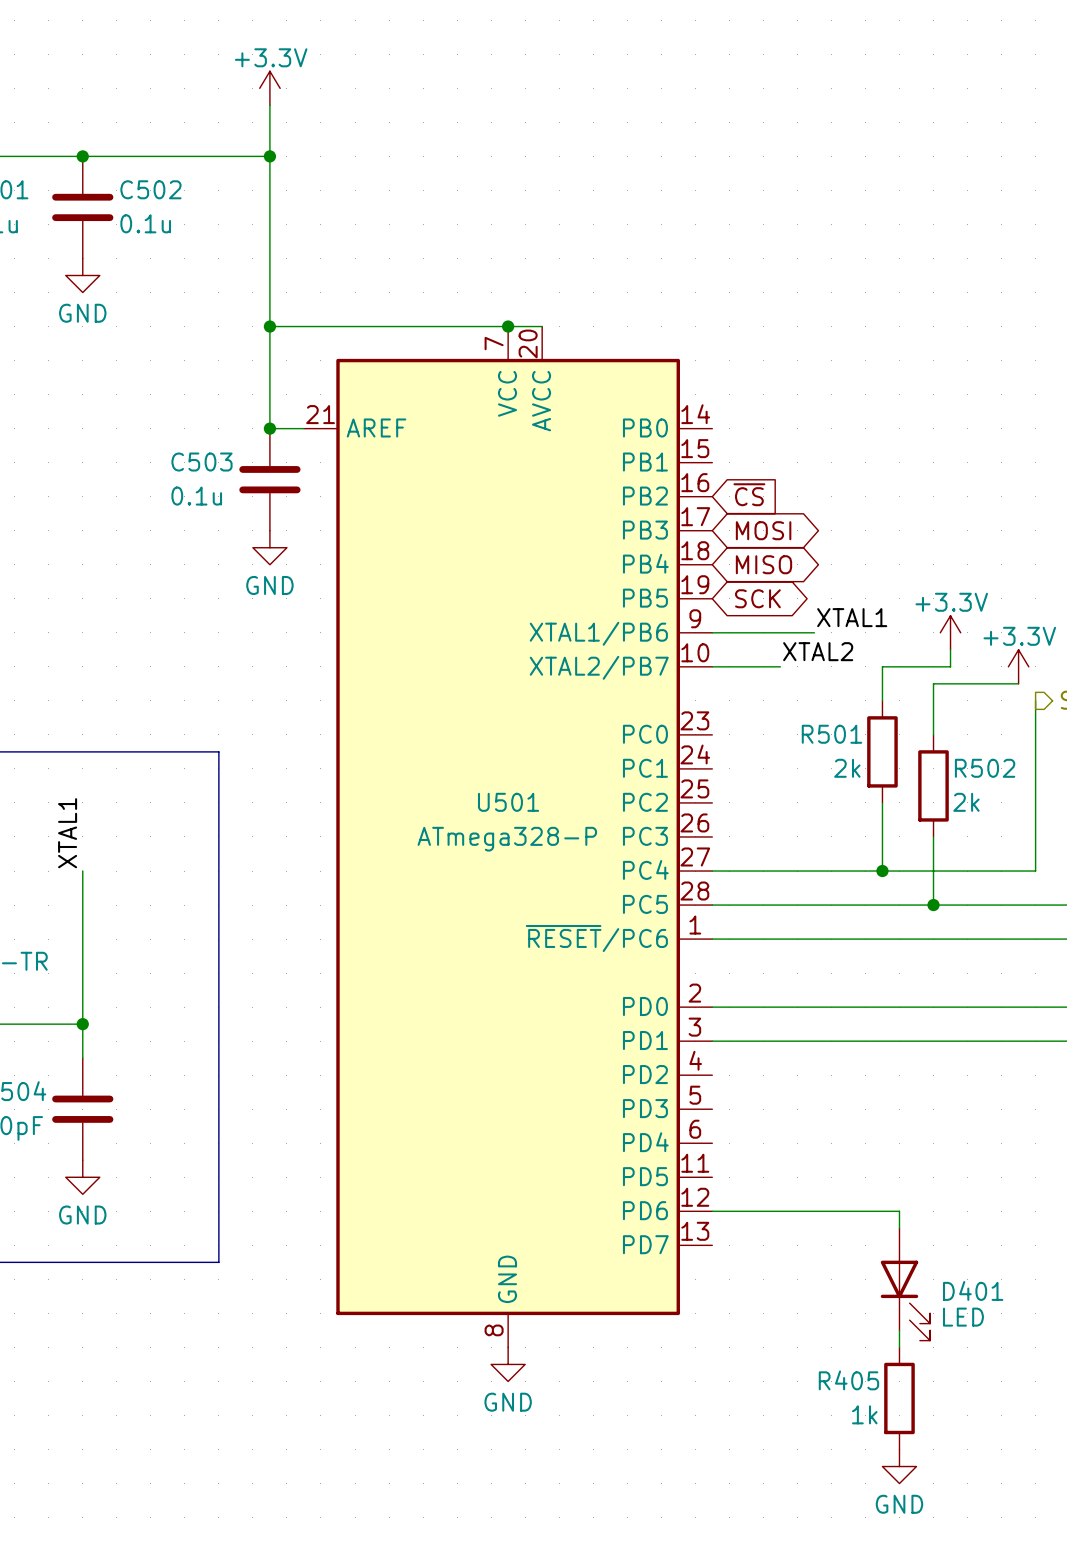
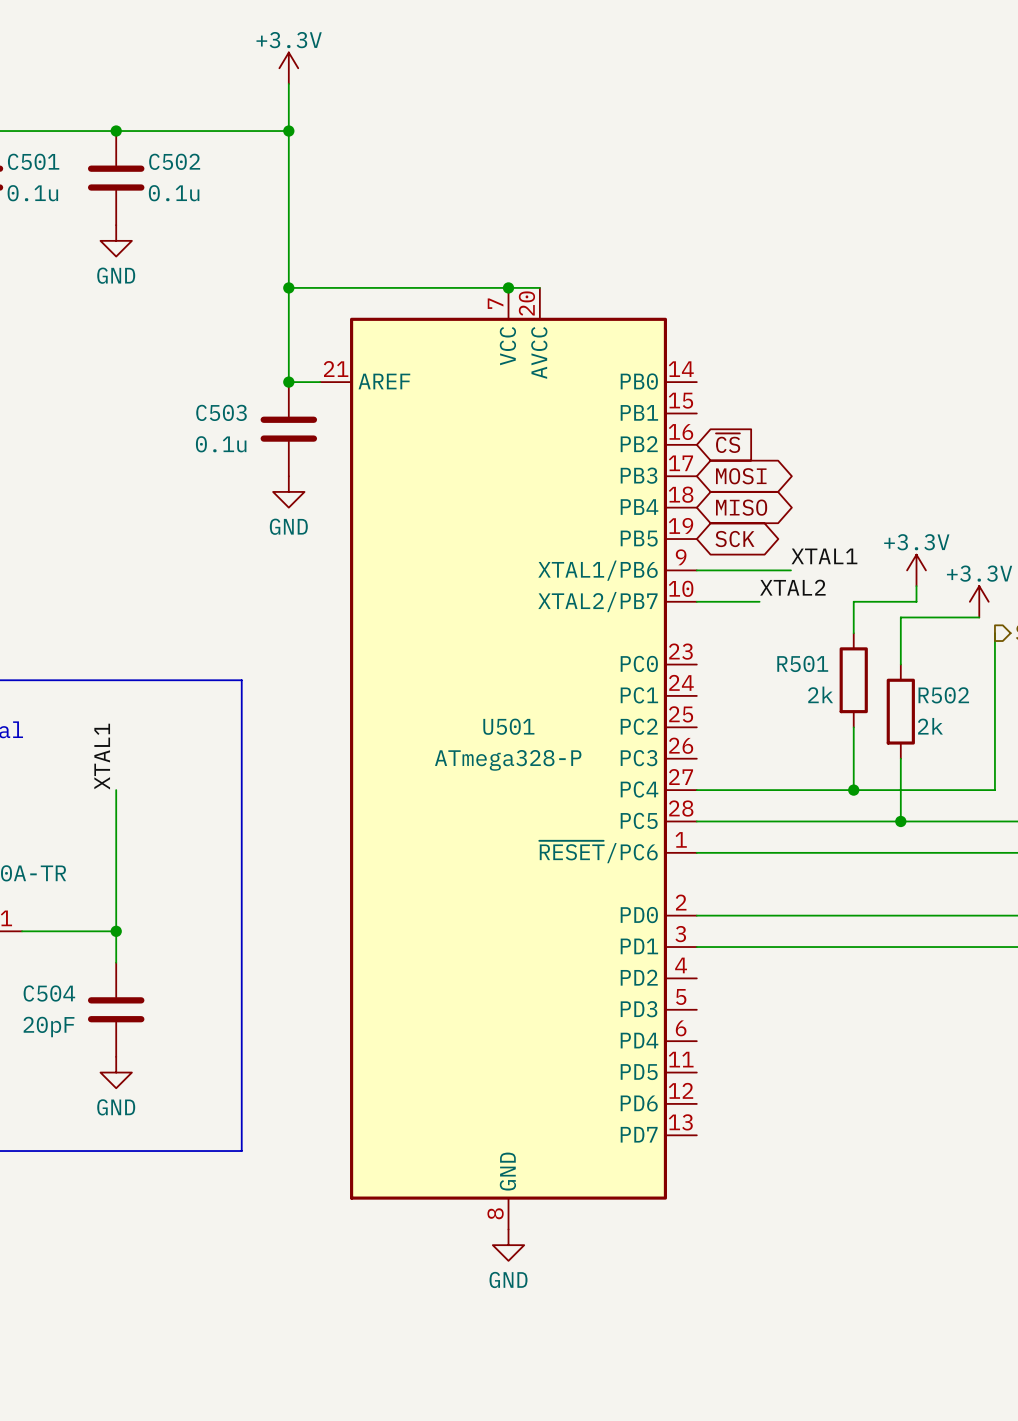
wire: (712, 1211) (899, 1211) (899, 1228) -> none
D401: LED (905, 1284) -> none
wire: (899, 1330) (899, 1347) -> none
R405: 1k (899, 1398) -> none
power symbol: GND (899, 1466) -> none

